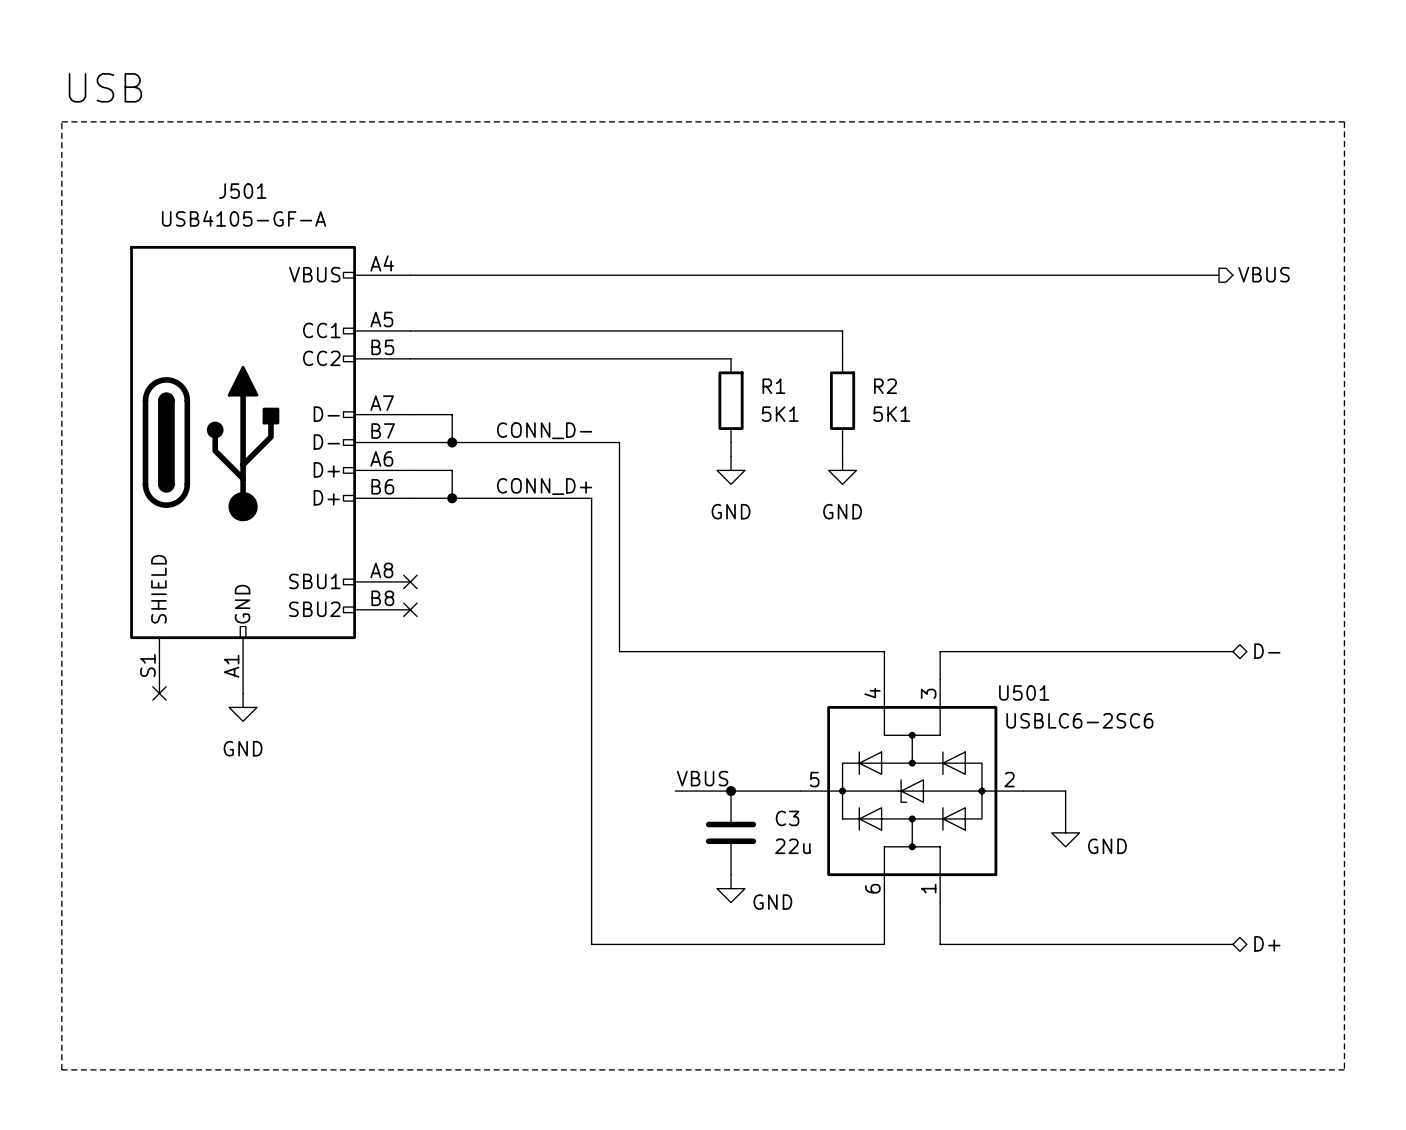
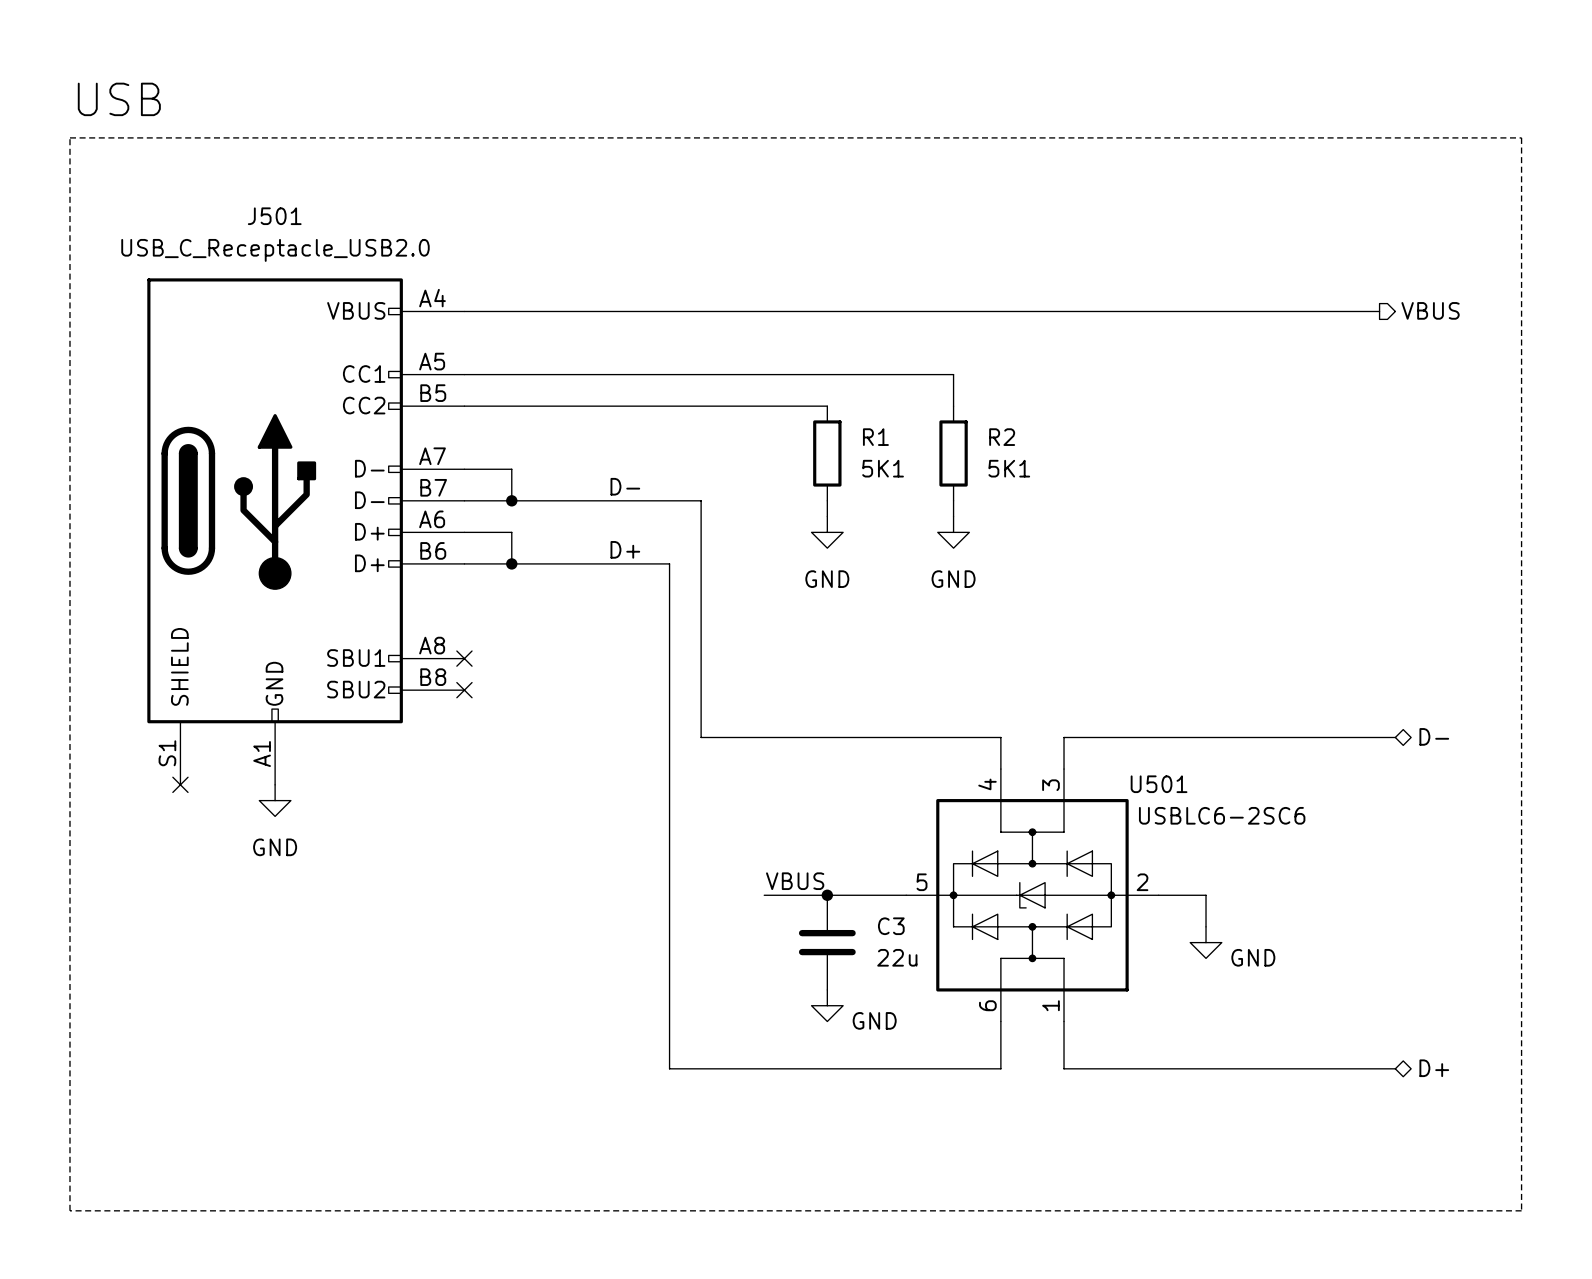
J501 value: USB4105-GF-A (244, 218) -> USB_C_Receptacle_USB2.0 (275, 250)
label: CONN_D- (544, 430) -> none
label: none -> D- (625, 486)
label: none -> D+ (625, 549)
label: CONN_D+ (544, 486) -> none

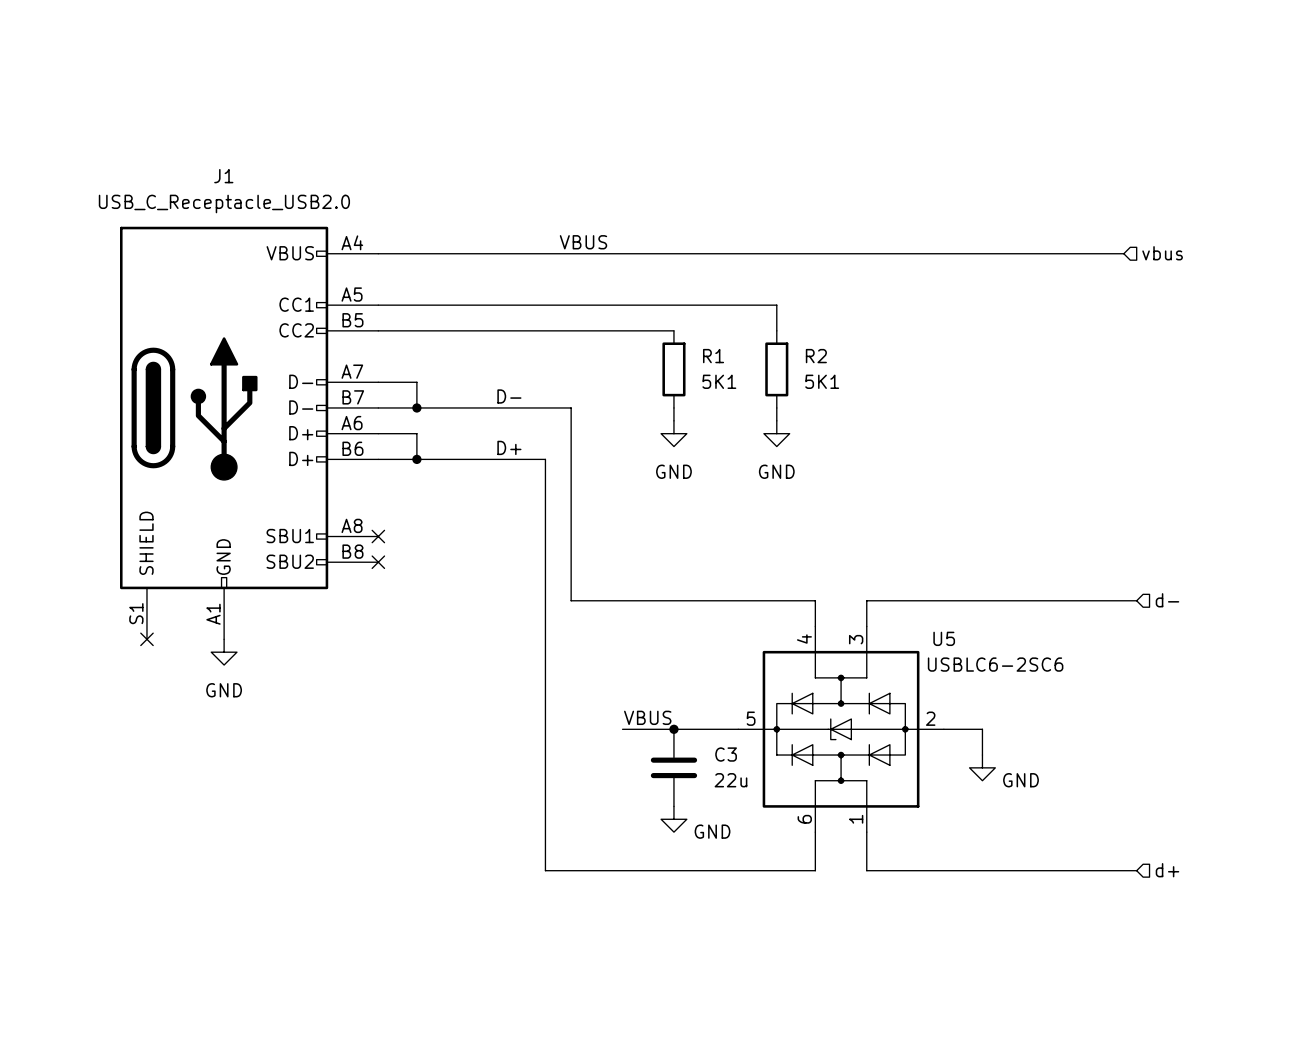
text: USB (119, 99) -> none
line: (69, 137) (1521, 137) (1521, 1210) (69, 1210) (69, 137) -> none
J501 name: J501 (274, 216) -> J1 (223, 176)
label: none -> VBUS (583, 242)
hierarchical label shape: output (1430, 310) -> input (1162, 253)
hierarchical label: VBUS (1430, 310) -> vbus (1162, 253)
hierarchical label shape: bidirectional (1434, 736) -> input (1167, 600)
hierarchical label: D- (1434, 736) -> d- (1167, 600)
U501 name: U501 (1159, 784) -> U5 (944, 638)
hierarchical label shape: bidirectional (1434, 1068) -> input (1167, 870)
hierarchical label: D+ (1434, 1068) -> d+ (1167, 870)

